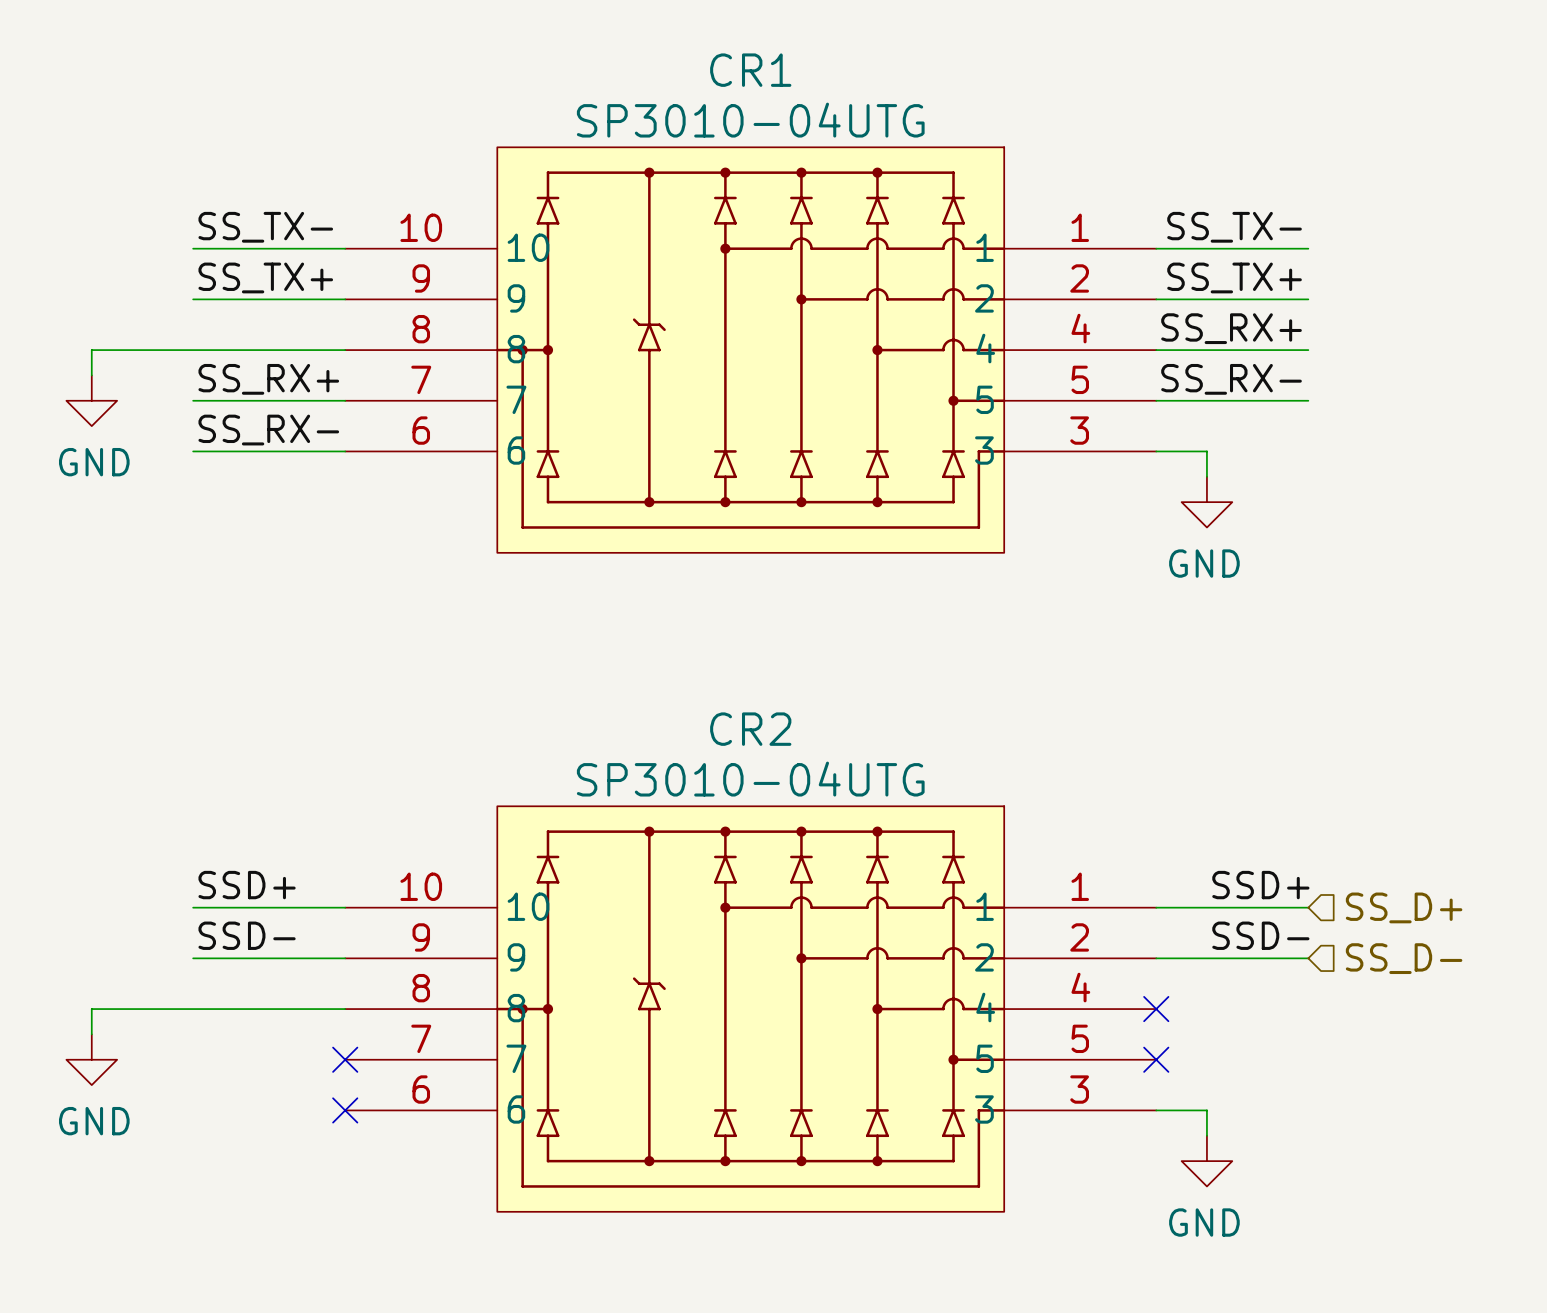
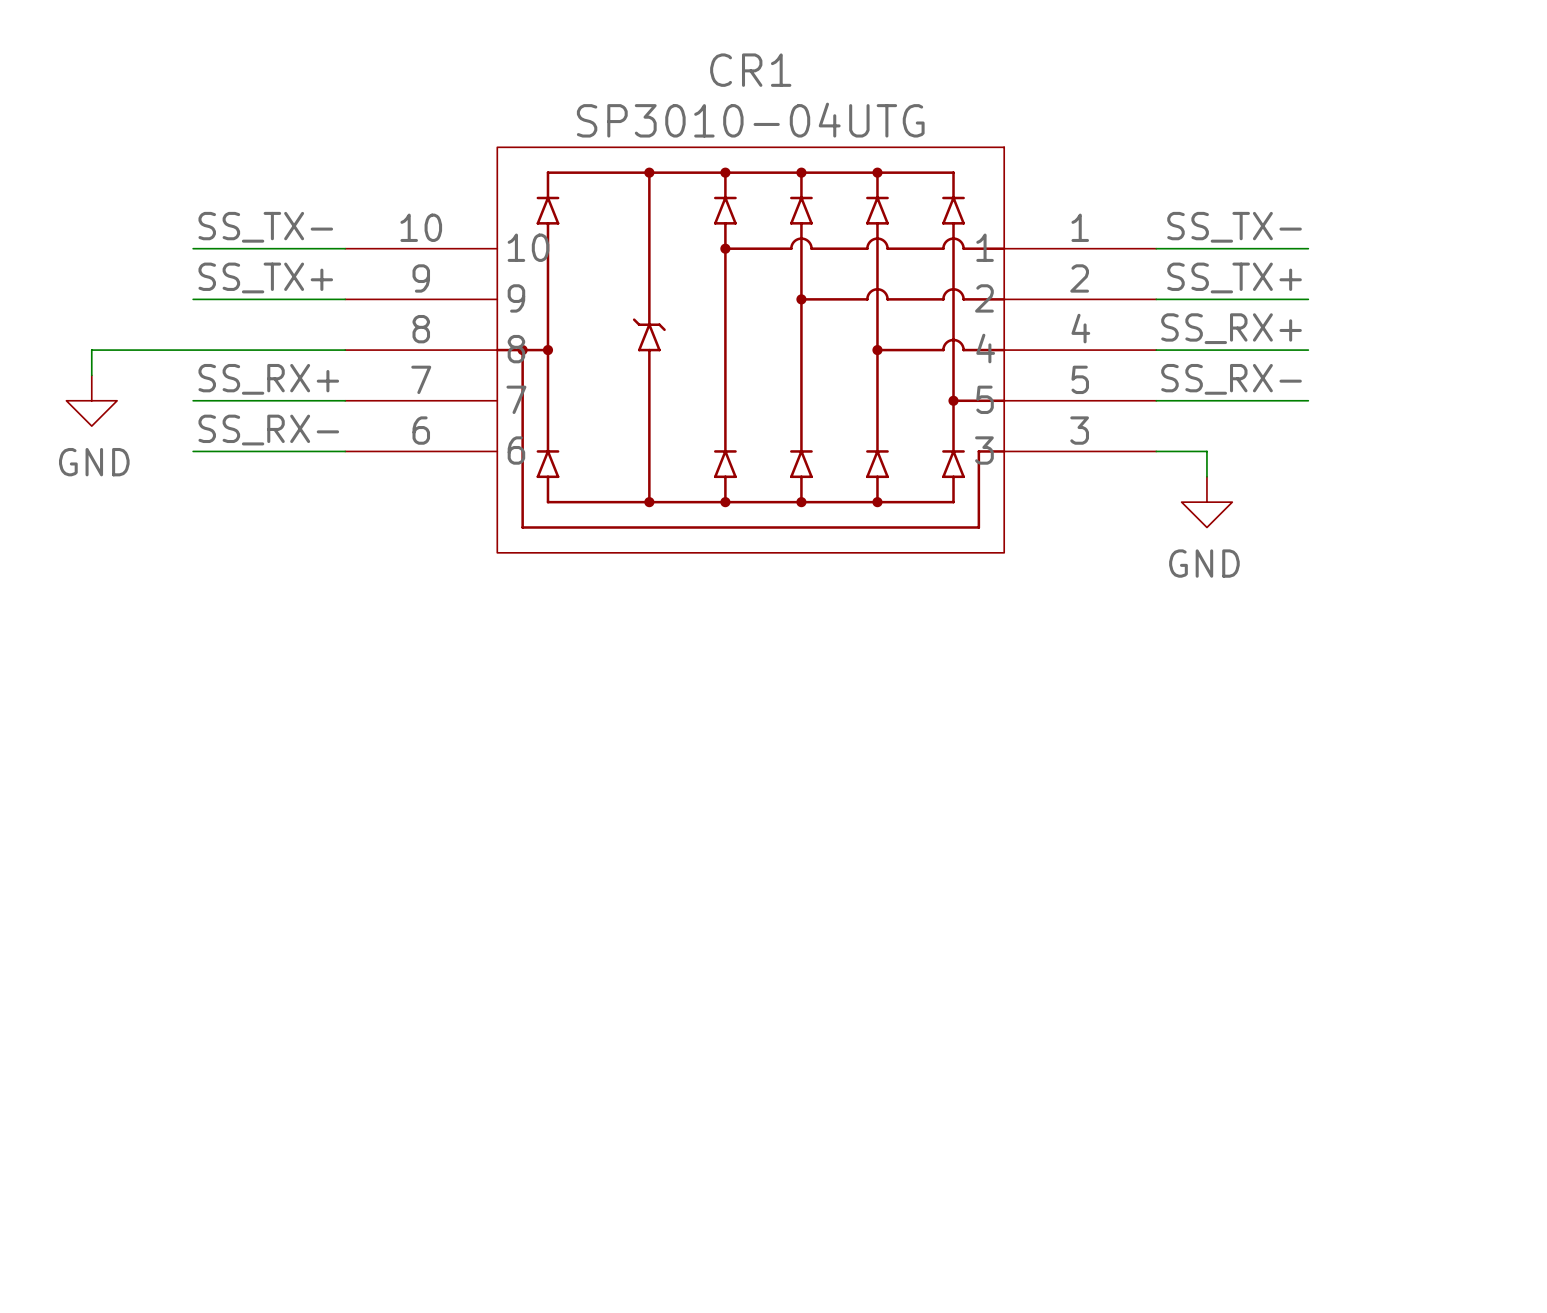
label: SSD+ (247, 885) -> none
label: SSD+ (1260, 885) -> none
wire: (193, 907) (345, 907) -> none
wire: (1156, 907) (1308, 907) -> none
hierarchical label: SS_D+ (1404, 907) -> none
label: SSD- (247, 935) -> none
label: SSD- (1260, 935) -> none
wire: (193, 958) (345, 958) -> none
wire: (1156, 958) (1308, 958) -> none
hierarchical label: SS_D- (1404, 958) -> none
wire: (345, 1009) (91, 1009) (91, 1034) -> none
CR2: SP3010-04UTG (750, 1009) -> none
no-connect mark: (1156, 1009) -> none
power symbol: GND (91, 1059) -> none
no-connect mark: (345, 1059) -> none
no-connect mark: (1156, 1059) -> none
no-connect mark: (345, 1110) -> none
wire: (1156, 1110) (1206, 1110) (1206, 1135) -> none
power symbol: GND (1206, 1161) -> none

